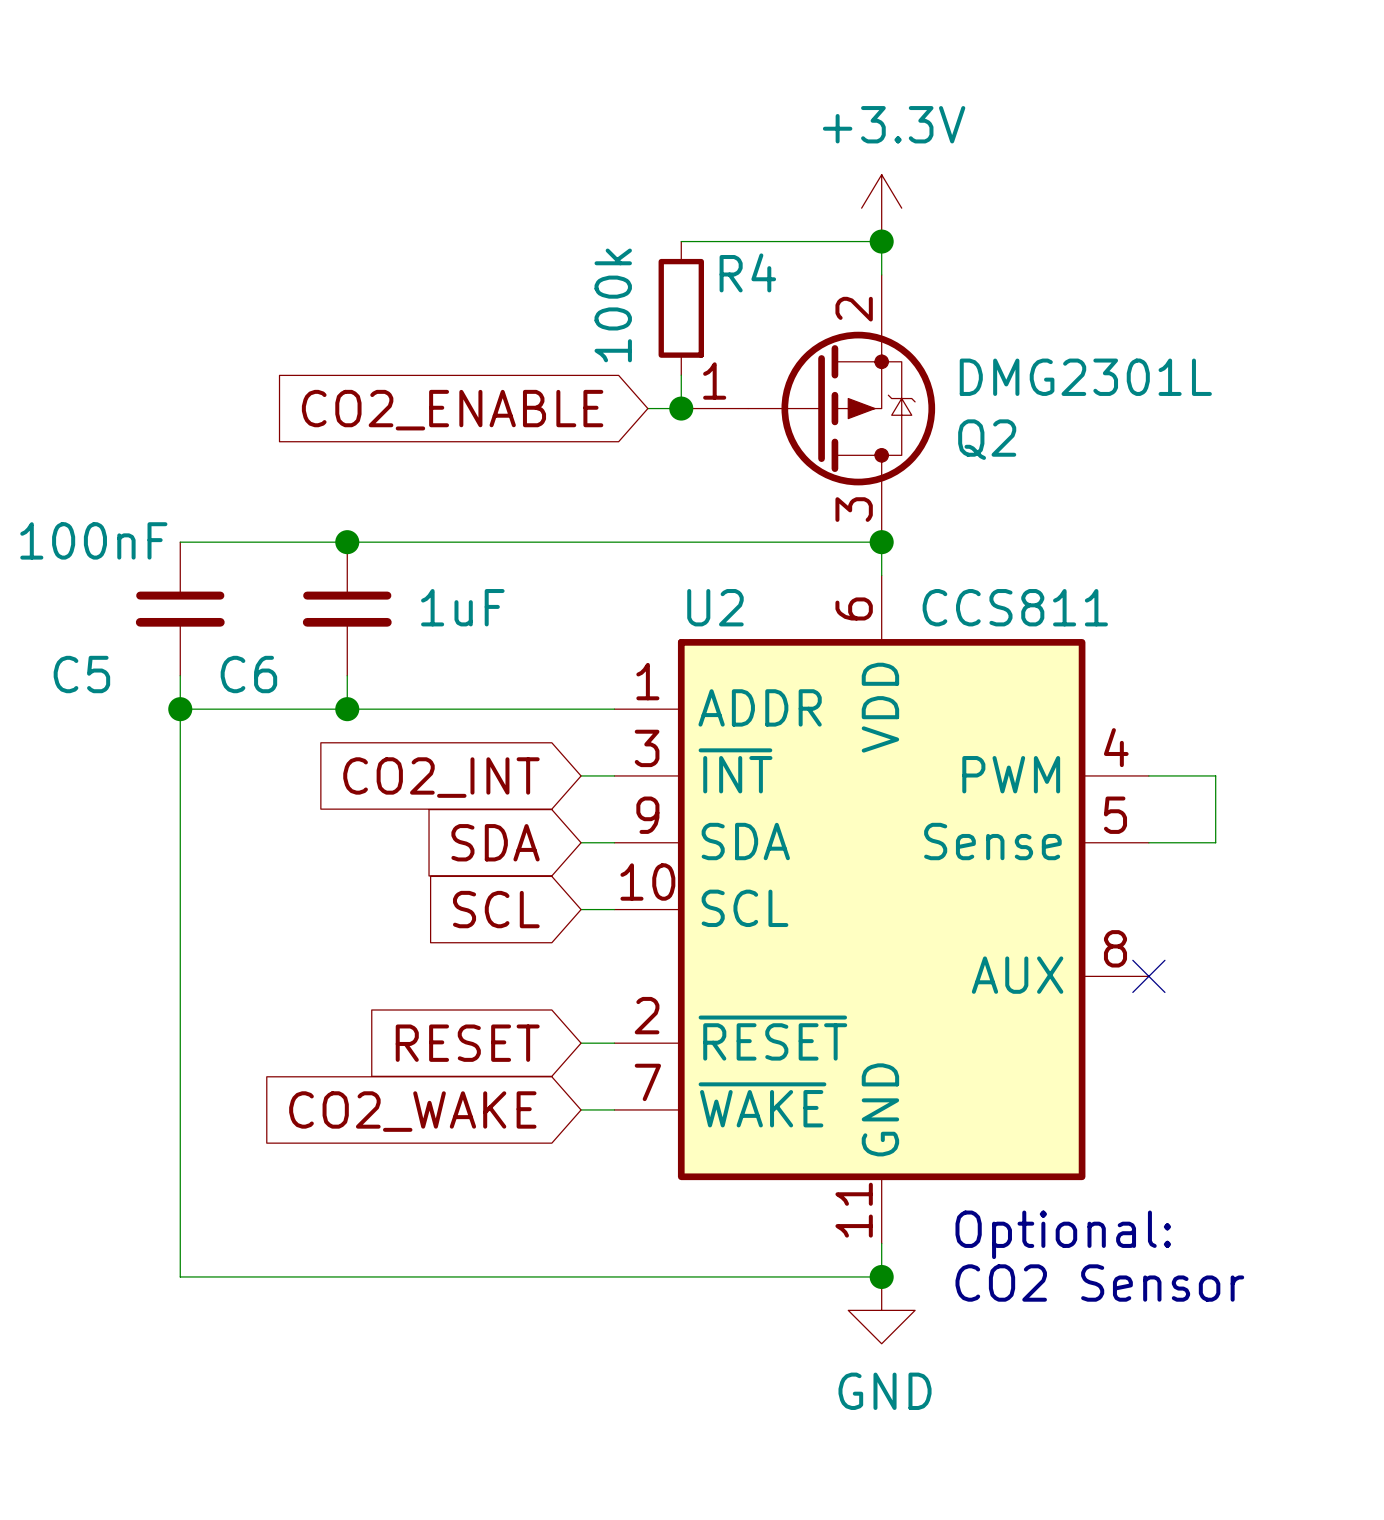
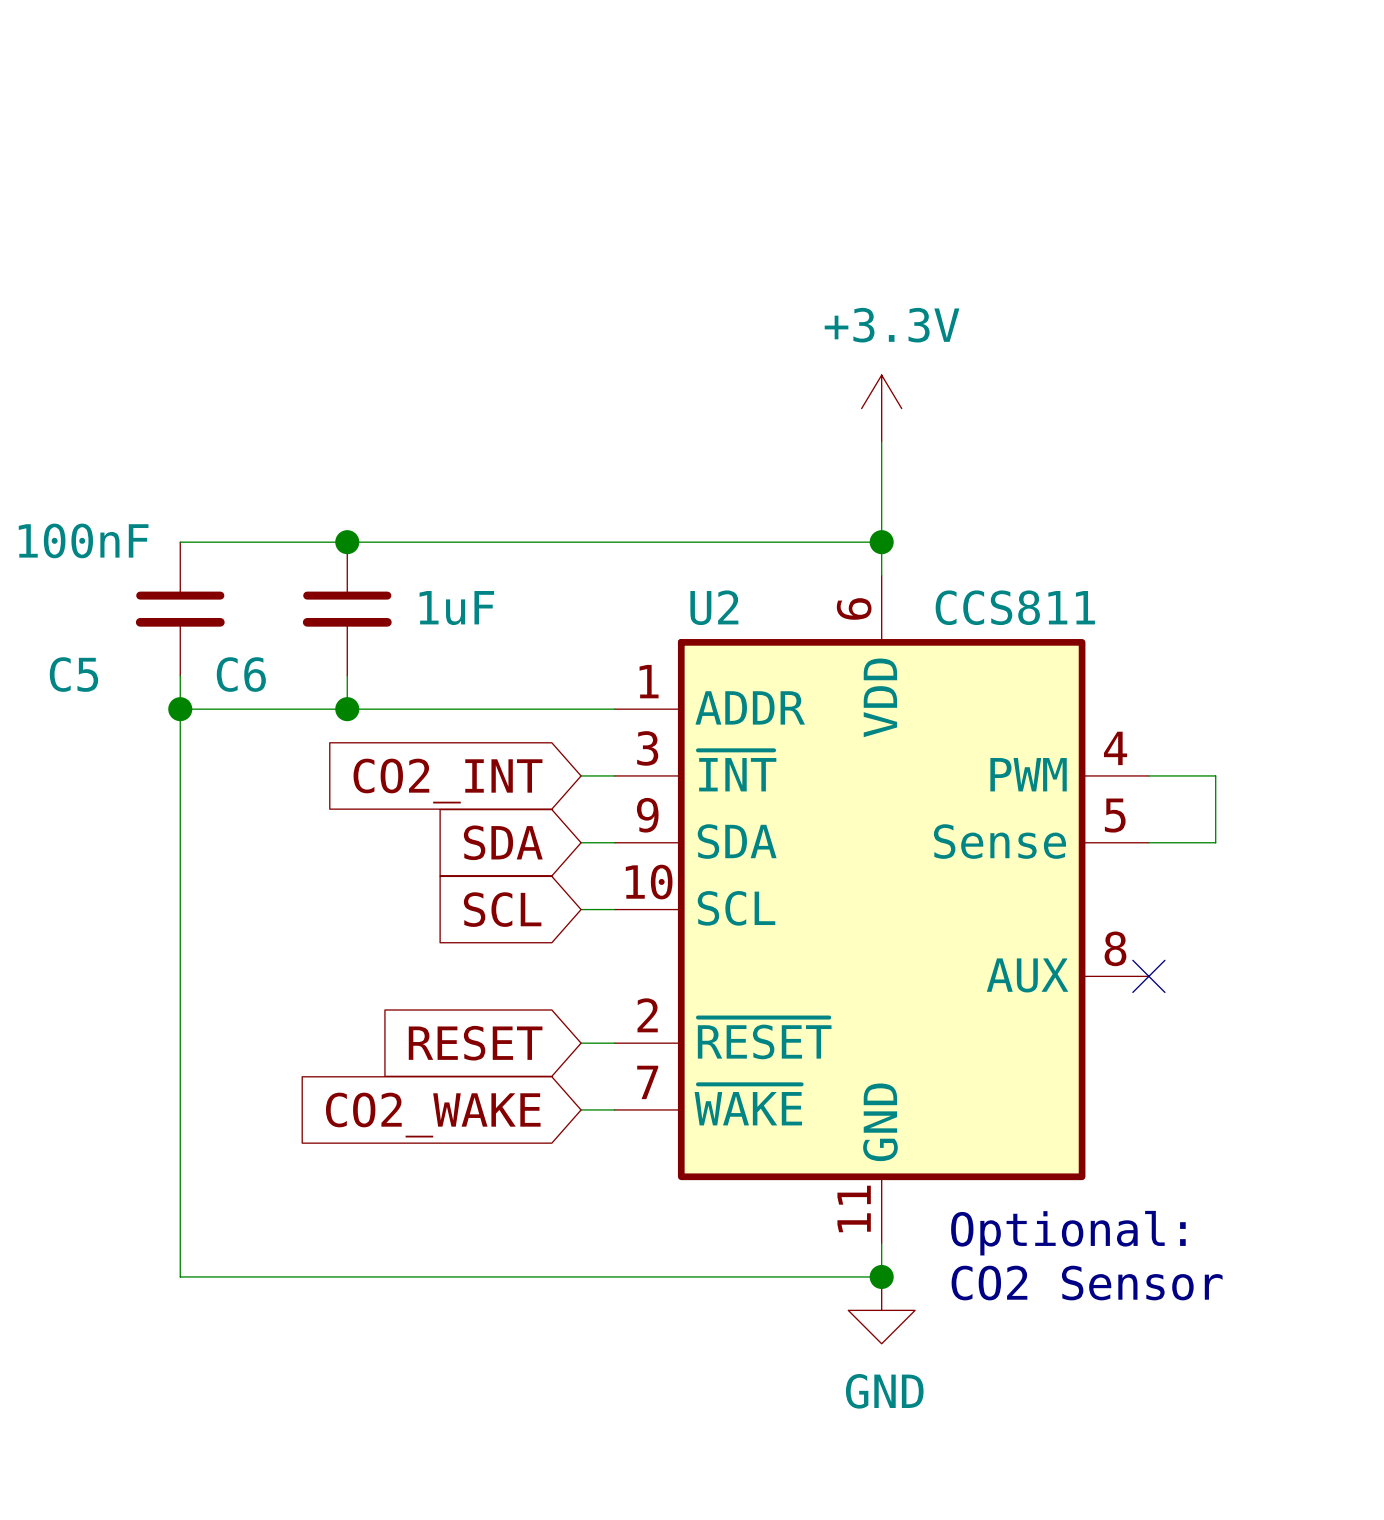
power symbol position: +3.3V (881, 208) -> +3.3V (881, 408)
wire: (681, 241) (881, 241) (881, 274) -> none
junction: (881, 241) -> none
R4: 100k (681, 308) -> none
wire: (681, 375) (681, 408) (647, 408) -> none
junction: (681, 408) -> none
Q2: DMG2301L (808, 408) -> none
global label: CO2_ENABLE (452, 410) -> none

